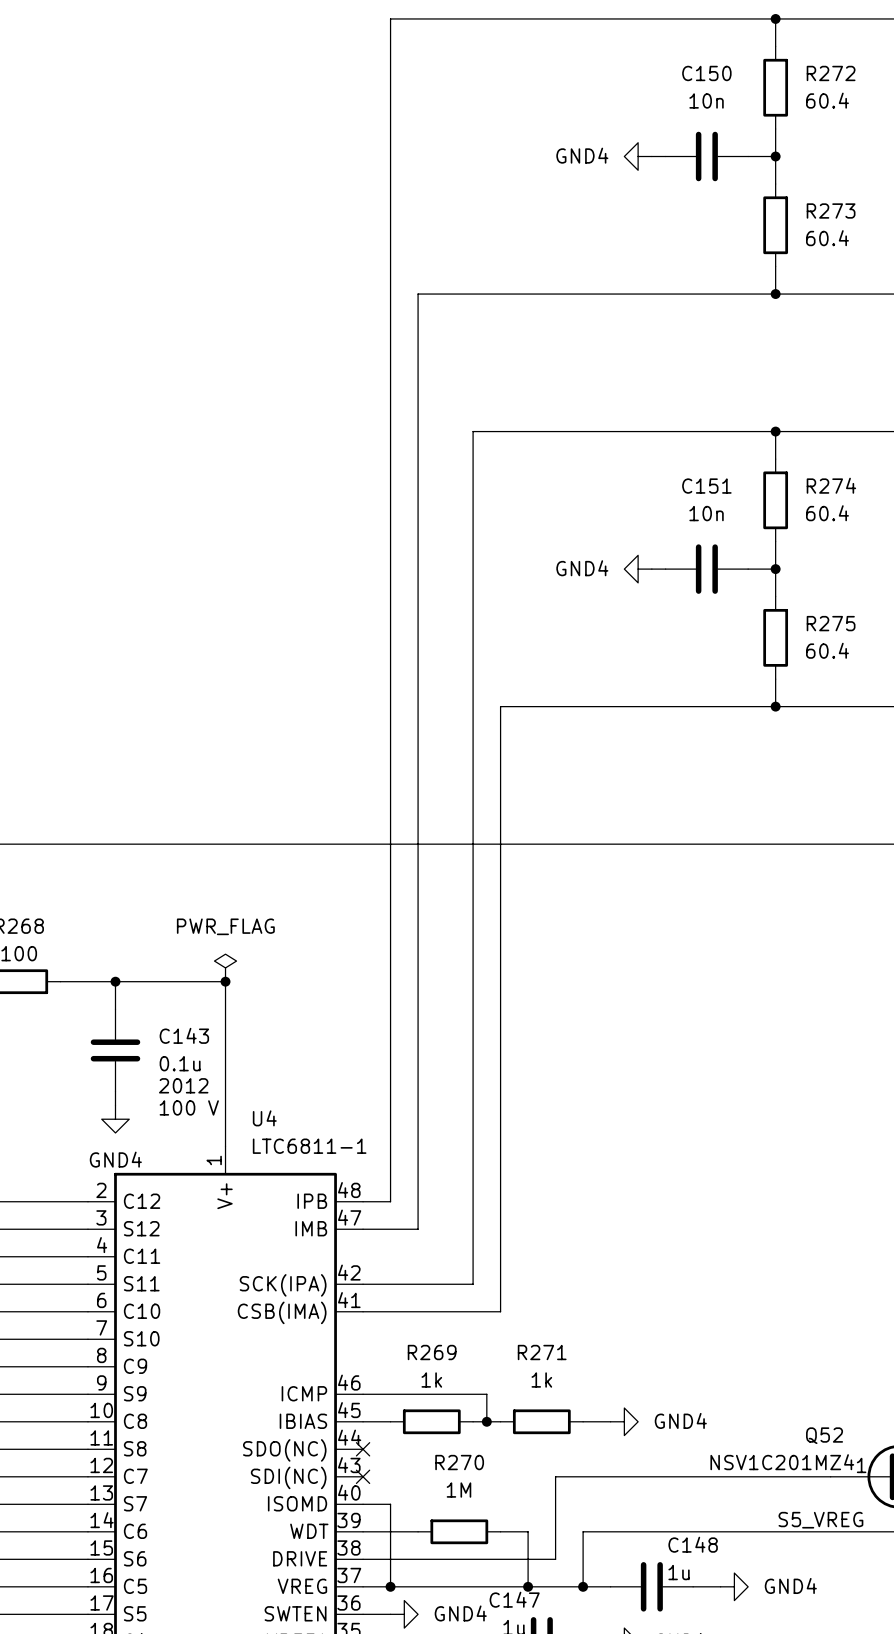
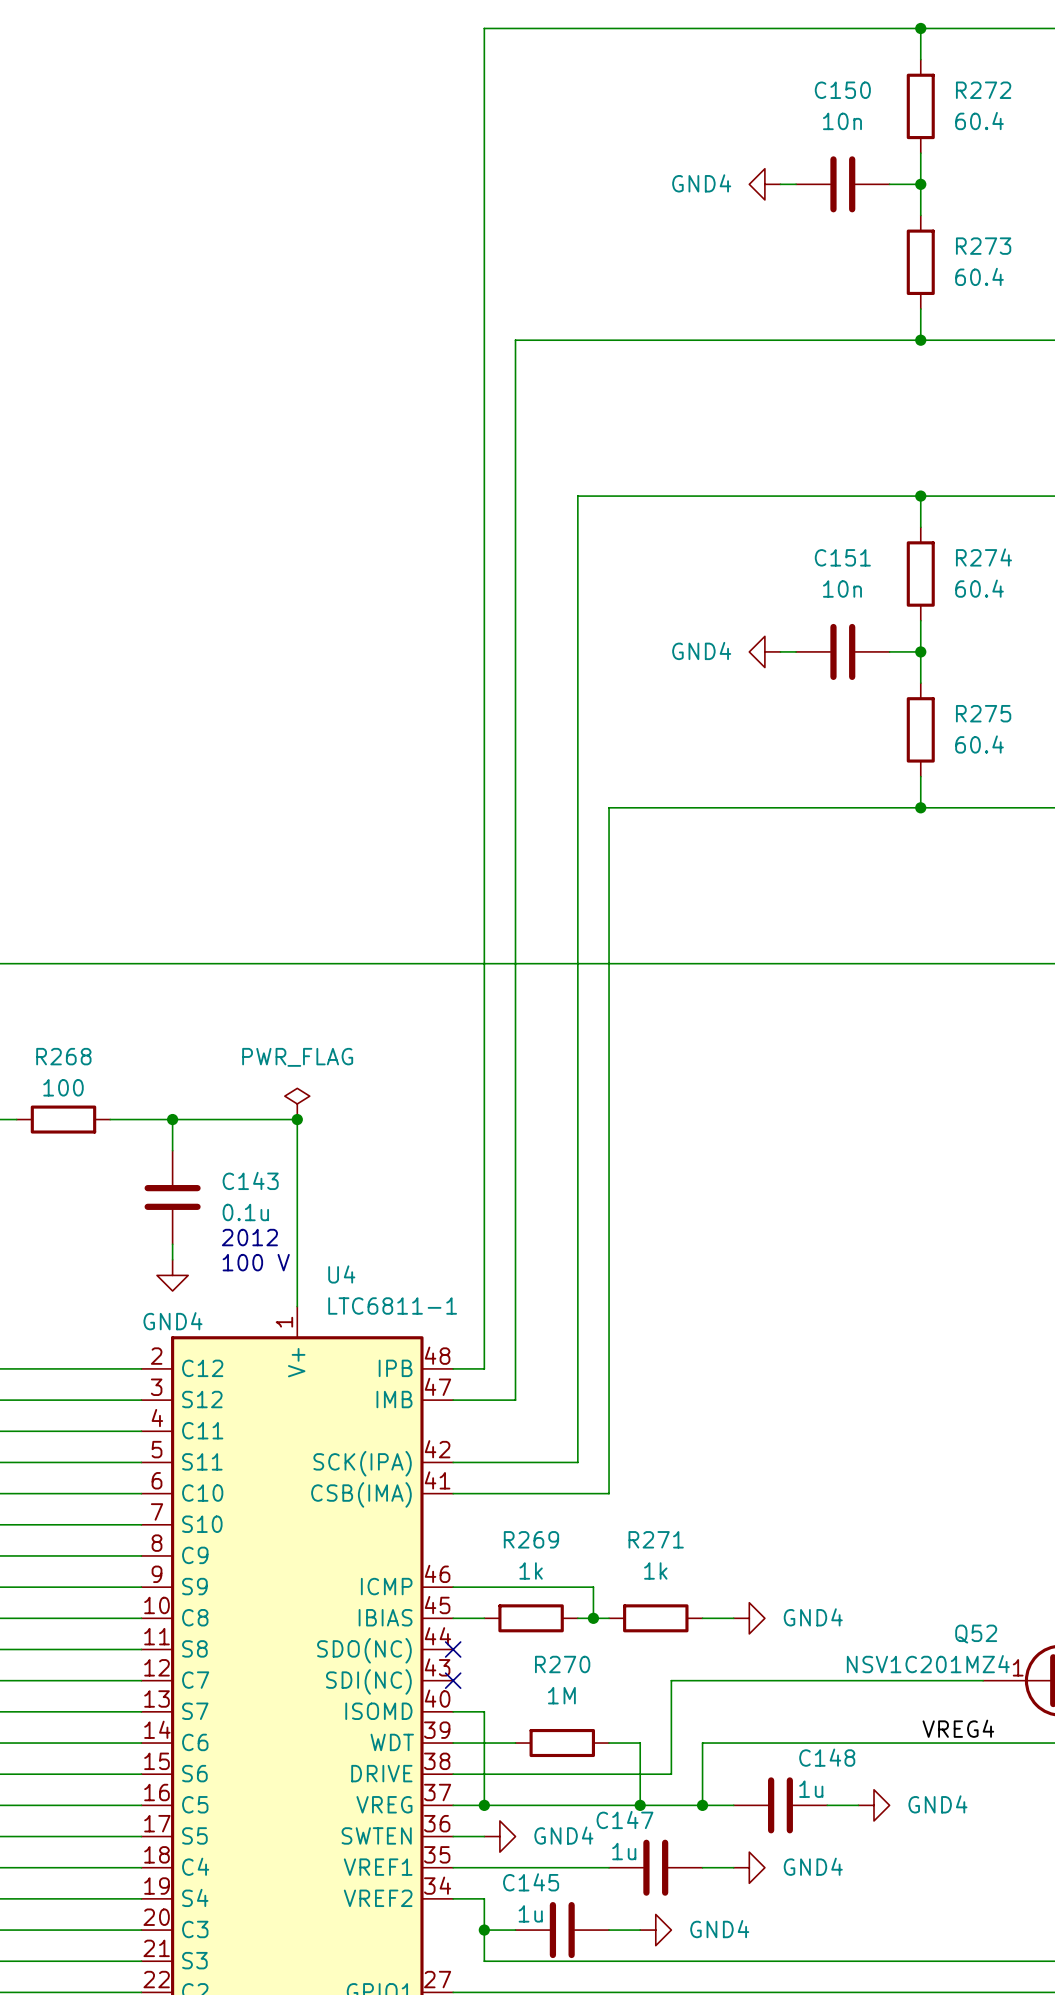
label: S5_VREG (820, 1520) -> VREG4 (958, 1728)

